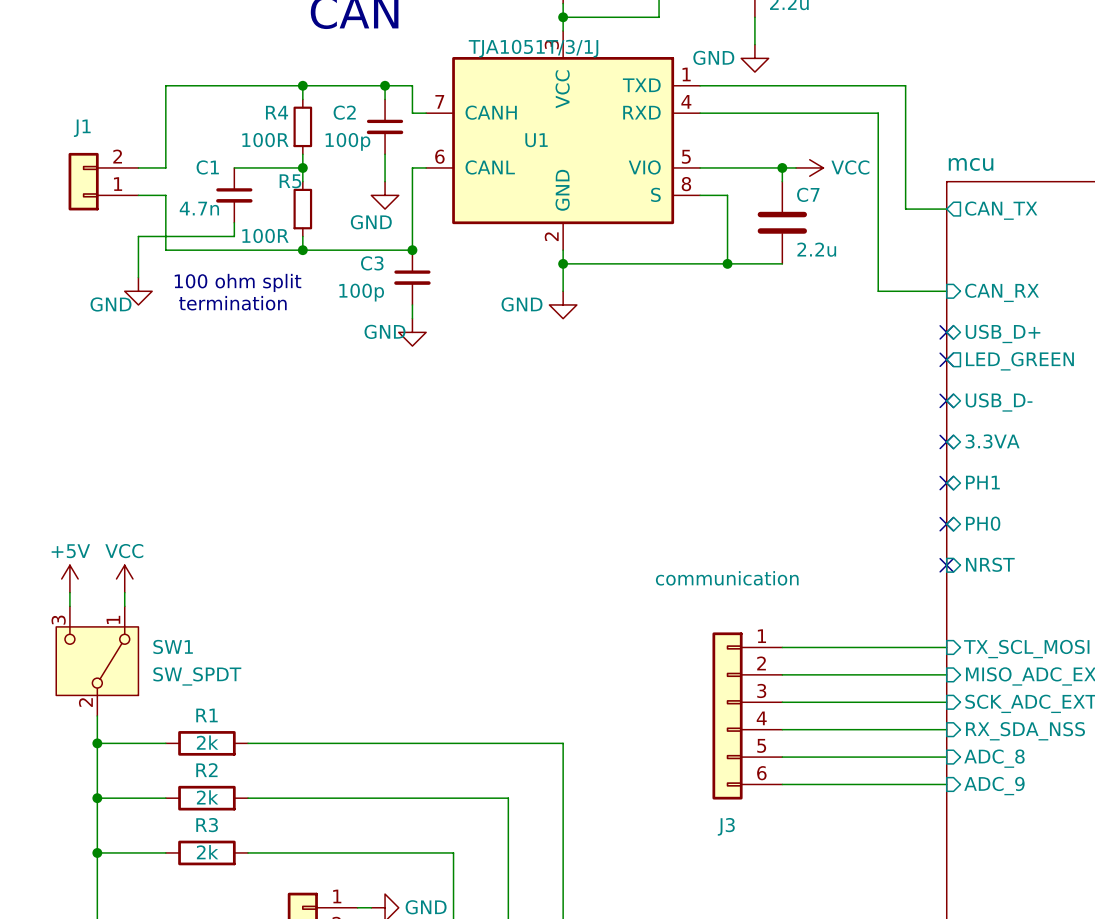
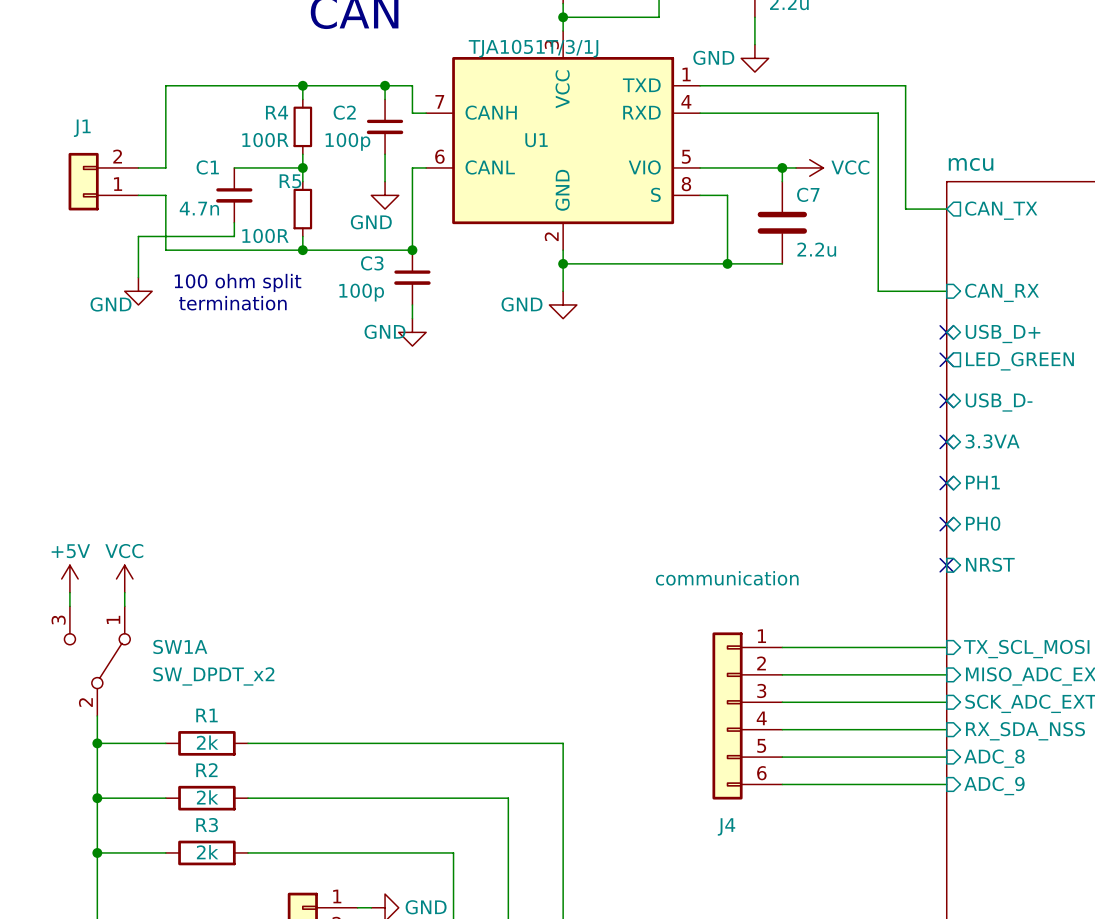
SW1: SW_SPDT (97, 661) -> none
SW1A: none -> SW_DPDT_x2 (97, 661)
J3 name: J3 (726, 826) -> J4 (726, 826)

